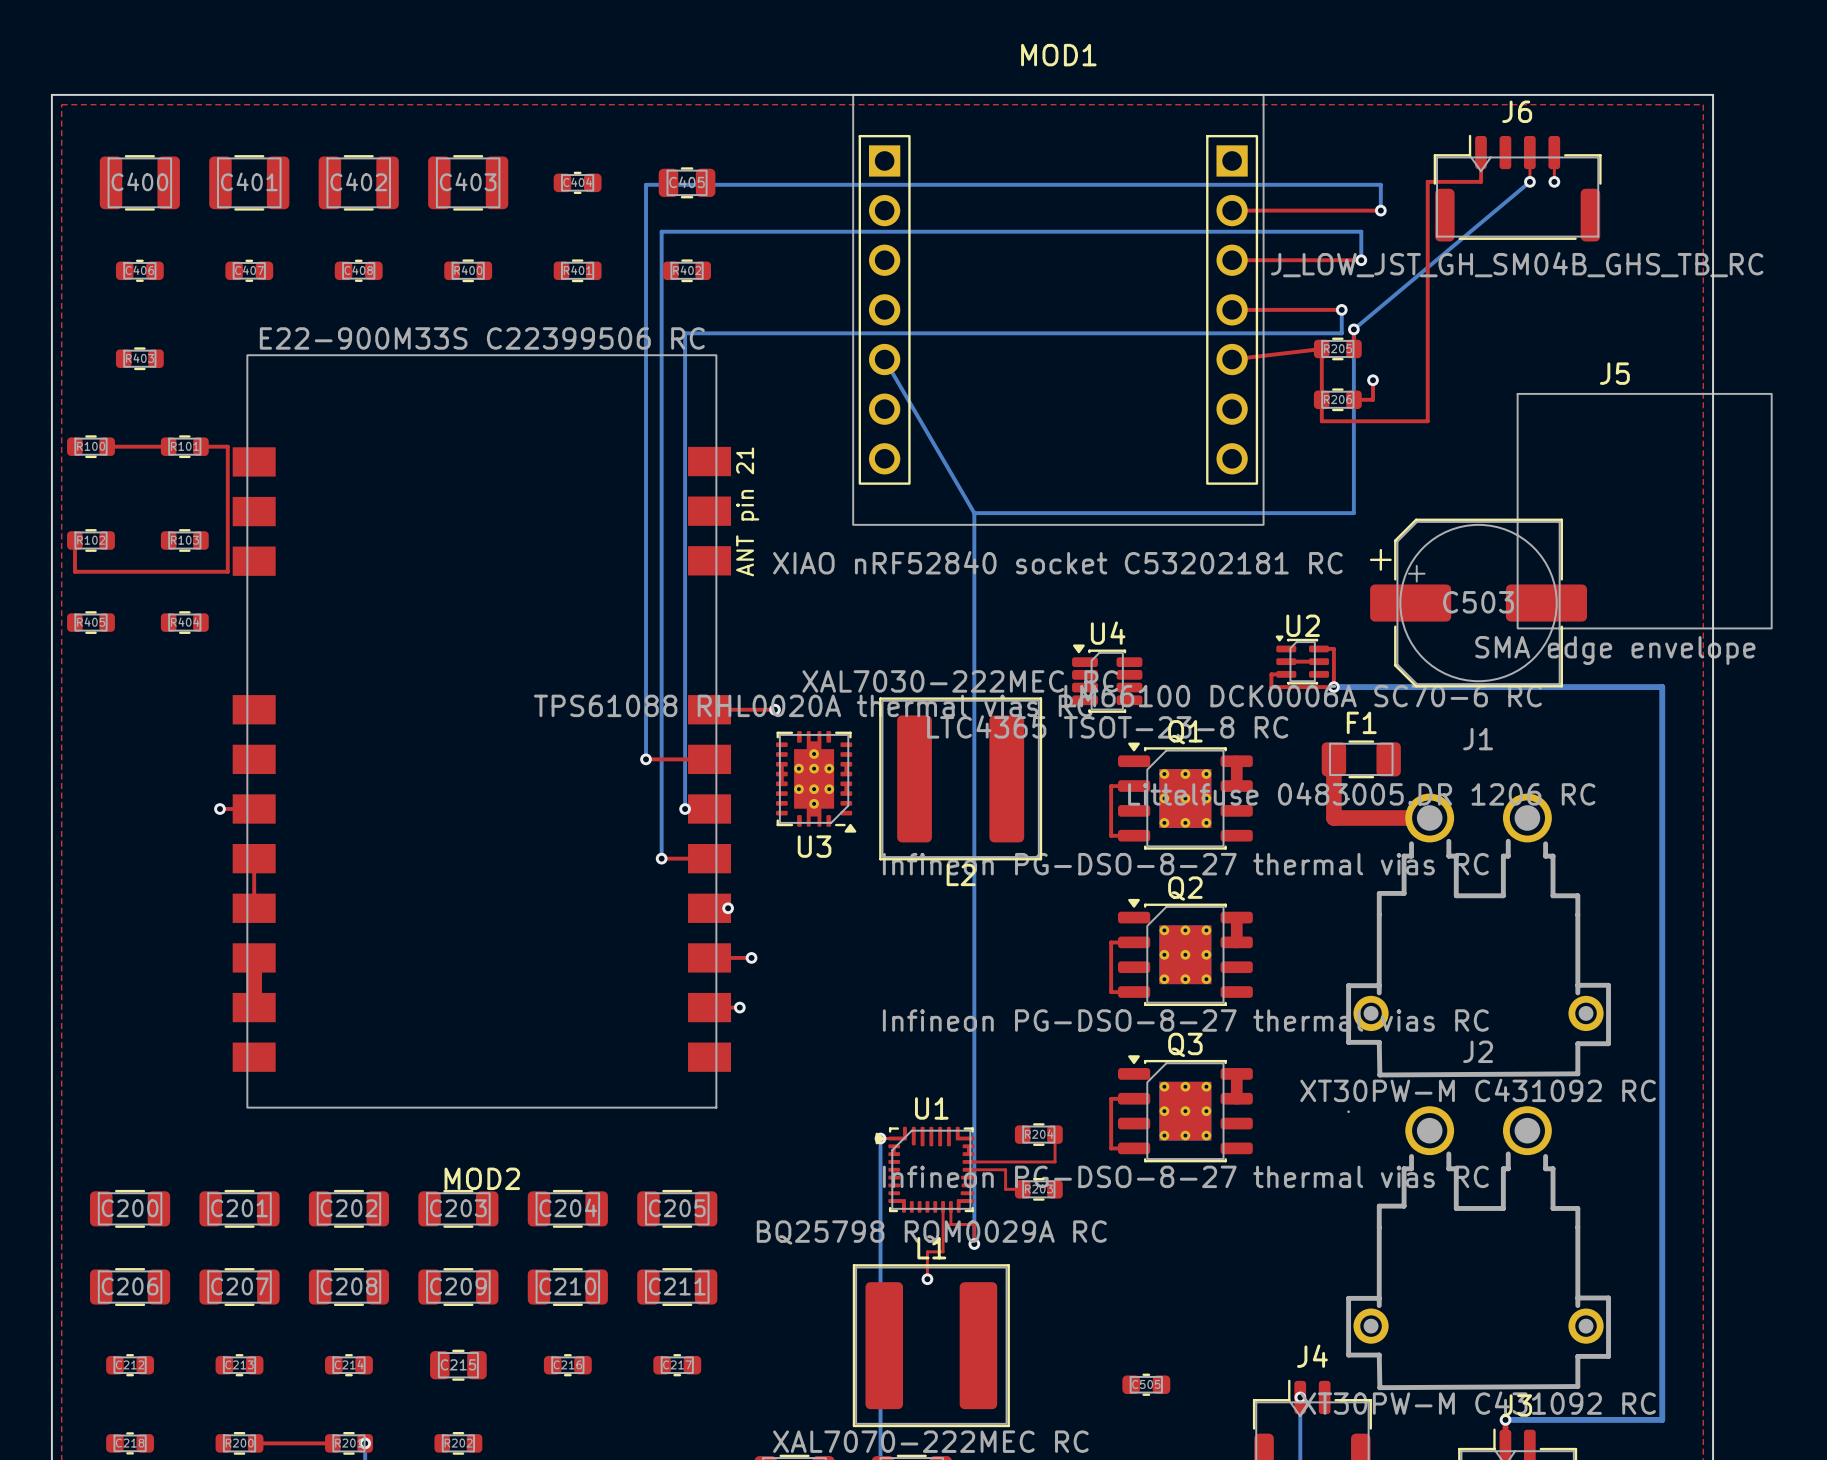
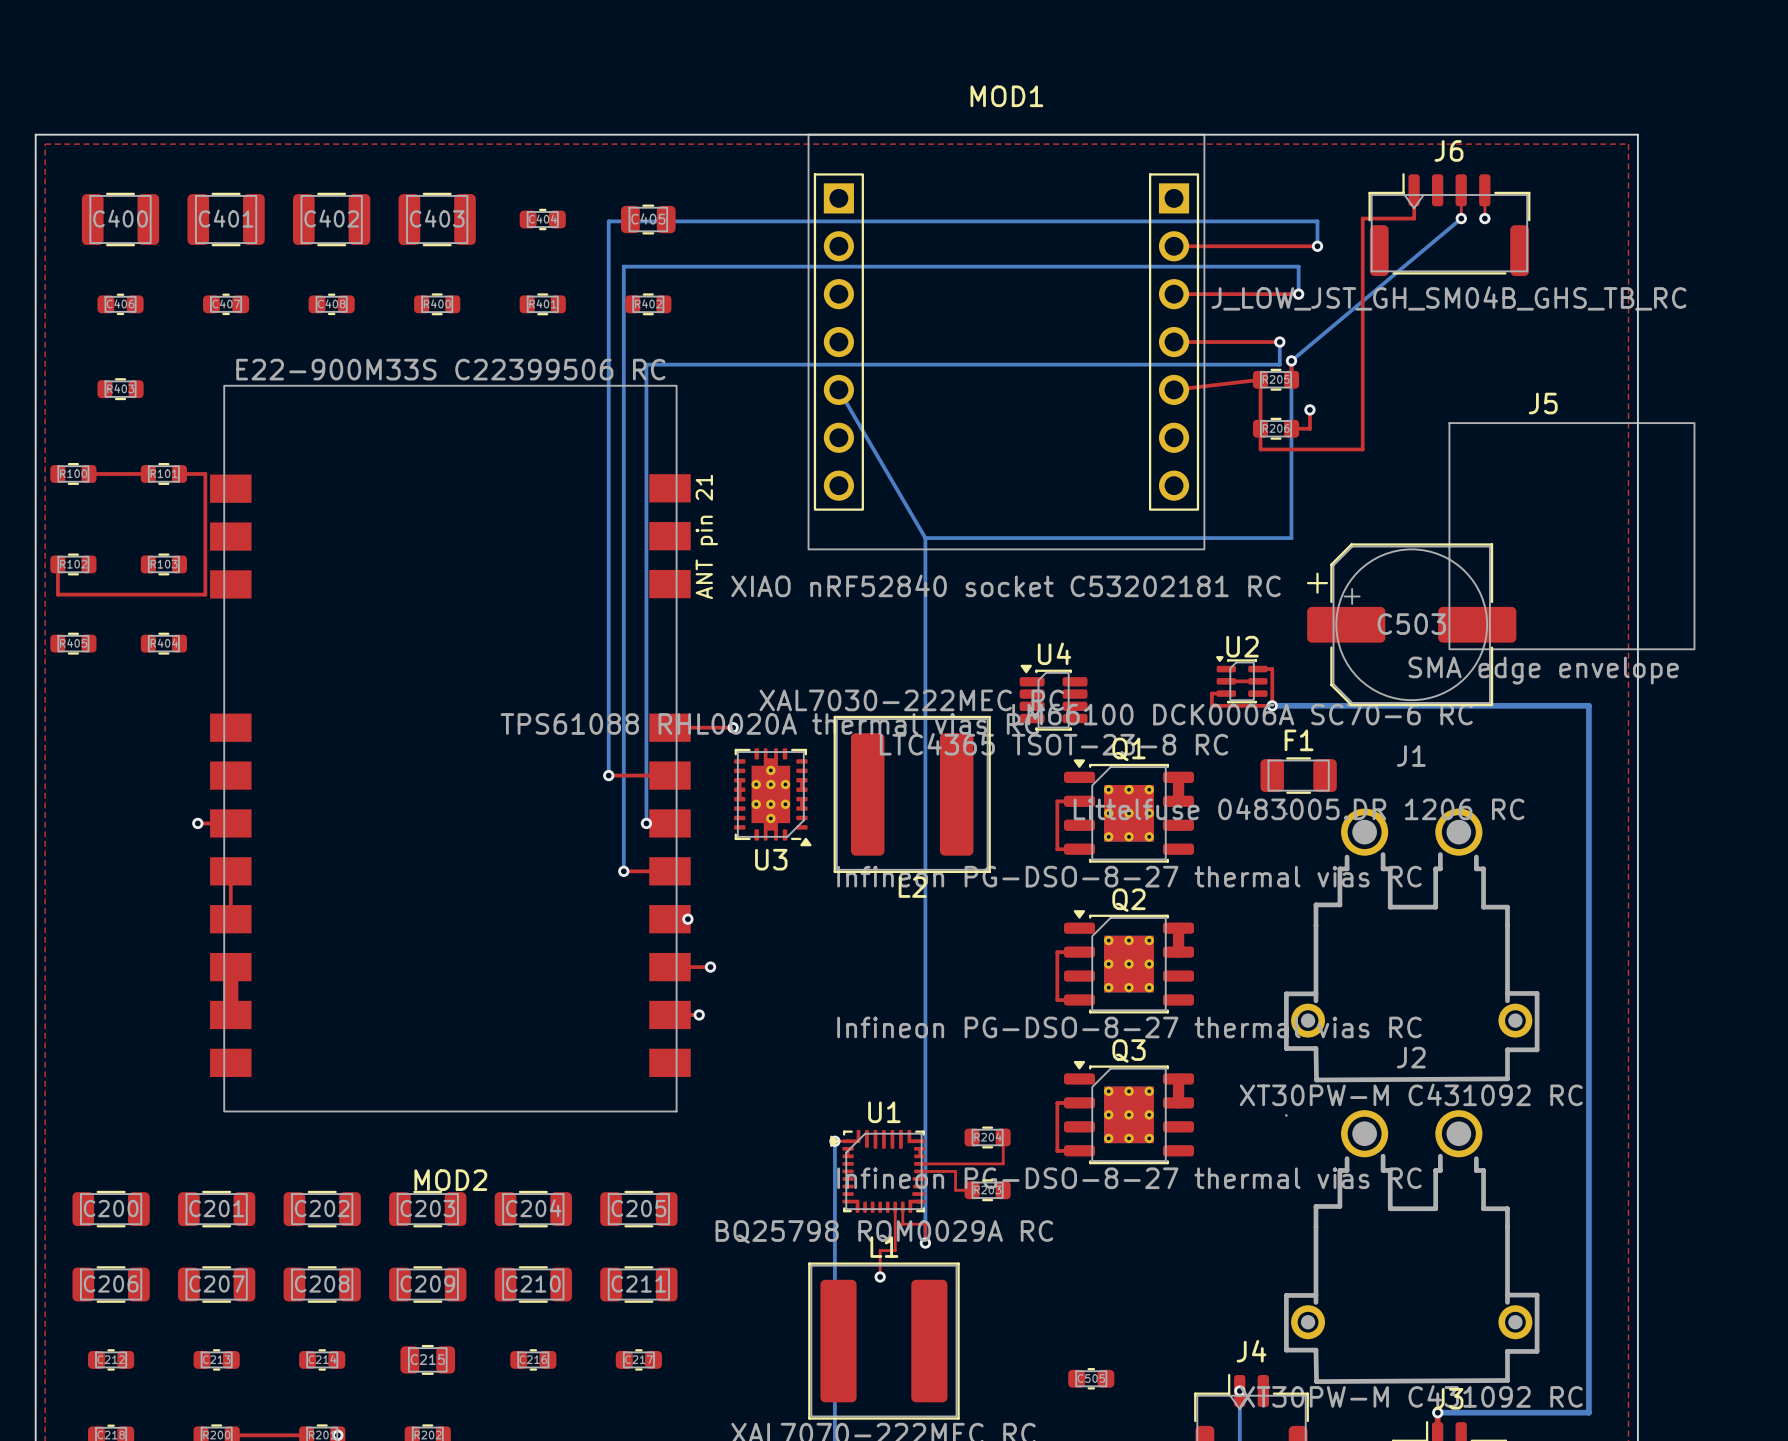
top track: (1333, 759) (1333, 818) (1429, 818) -> none

